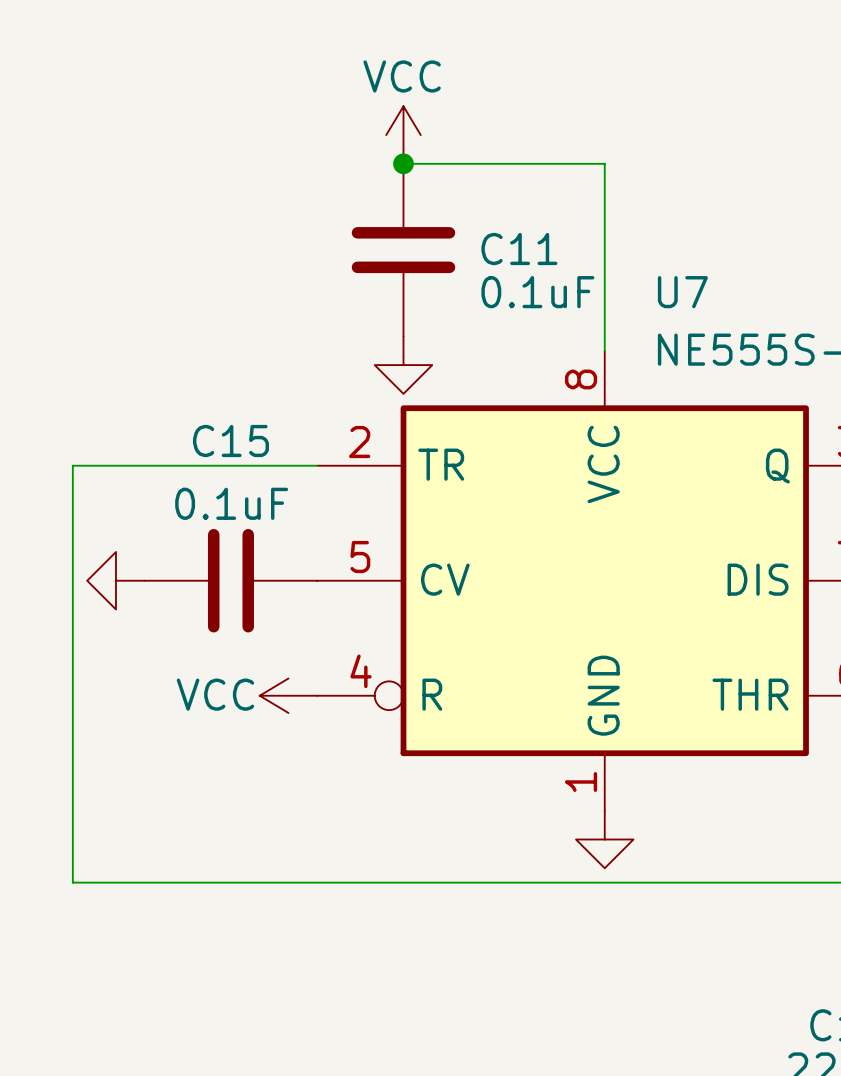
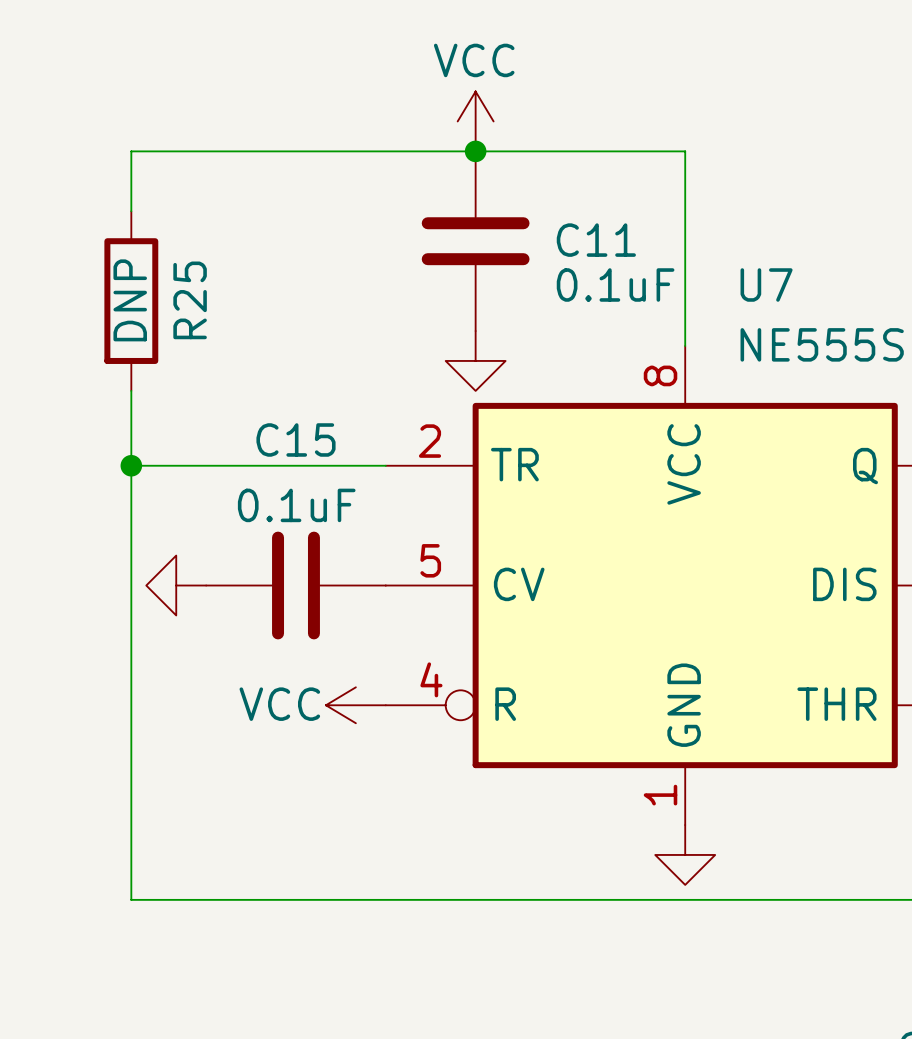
wire: none -> (475, 151) (131, 151) (131, 211)
R25: none -> DNP (131, 301)
wire: none -> (131, 390) (131, 465)
junction: none -> (131, 465)

